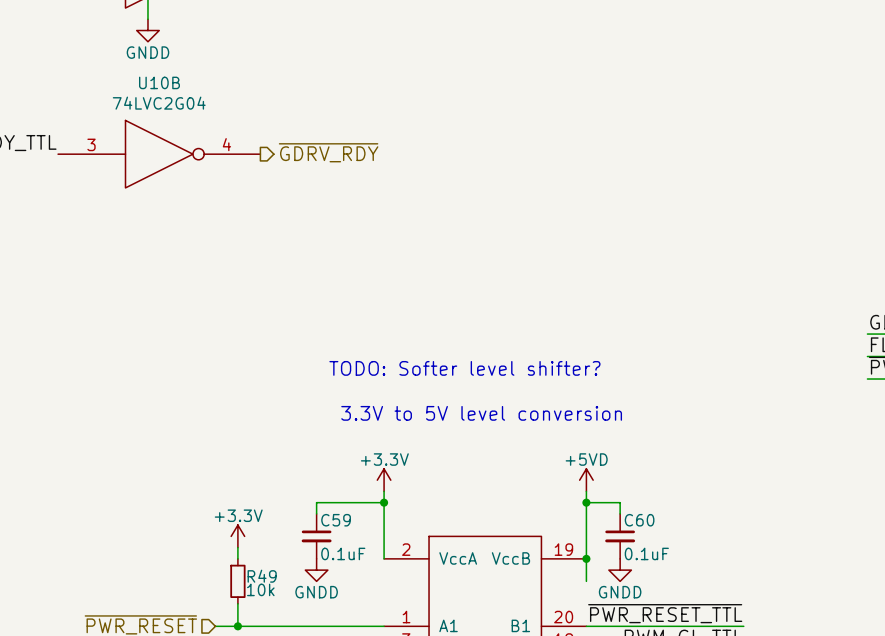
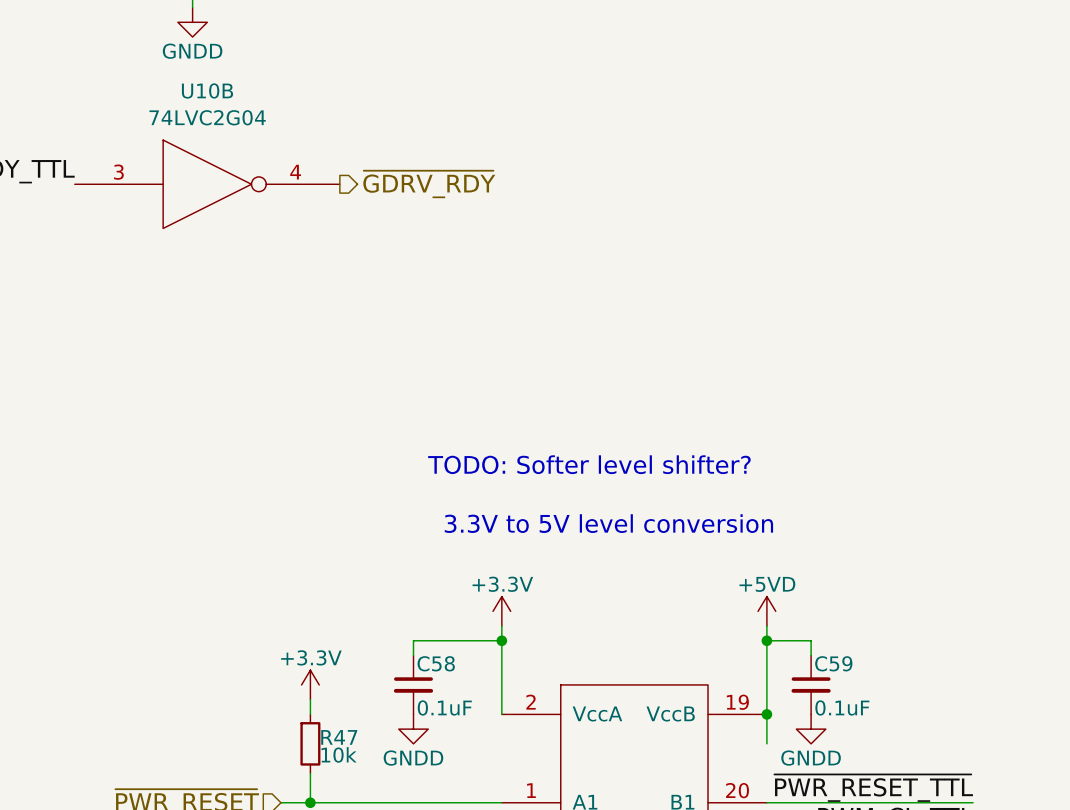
C59 name: C59 (336, 520) -> C58 (436, 663)
C60 name: C60 (639, 520) -> C59 (833, 663)
R49 name: R49 (262, 576) -> R47 (339, 737)

